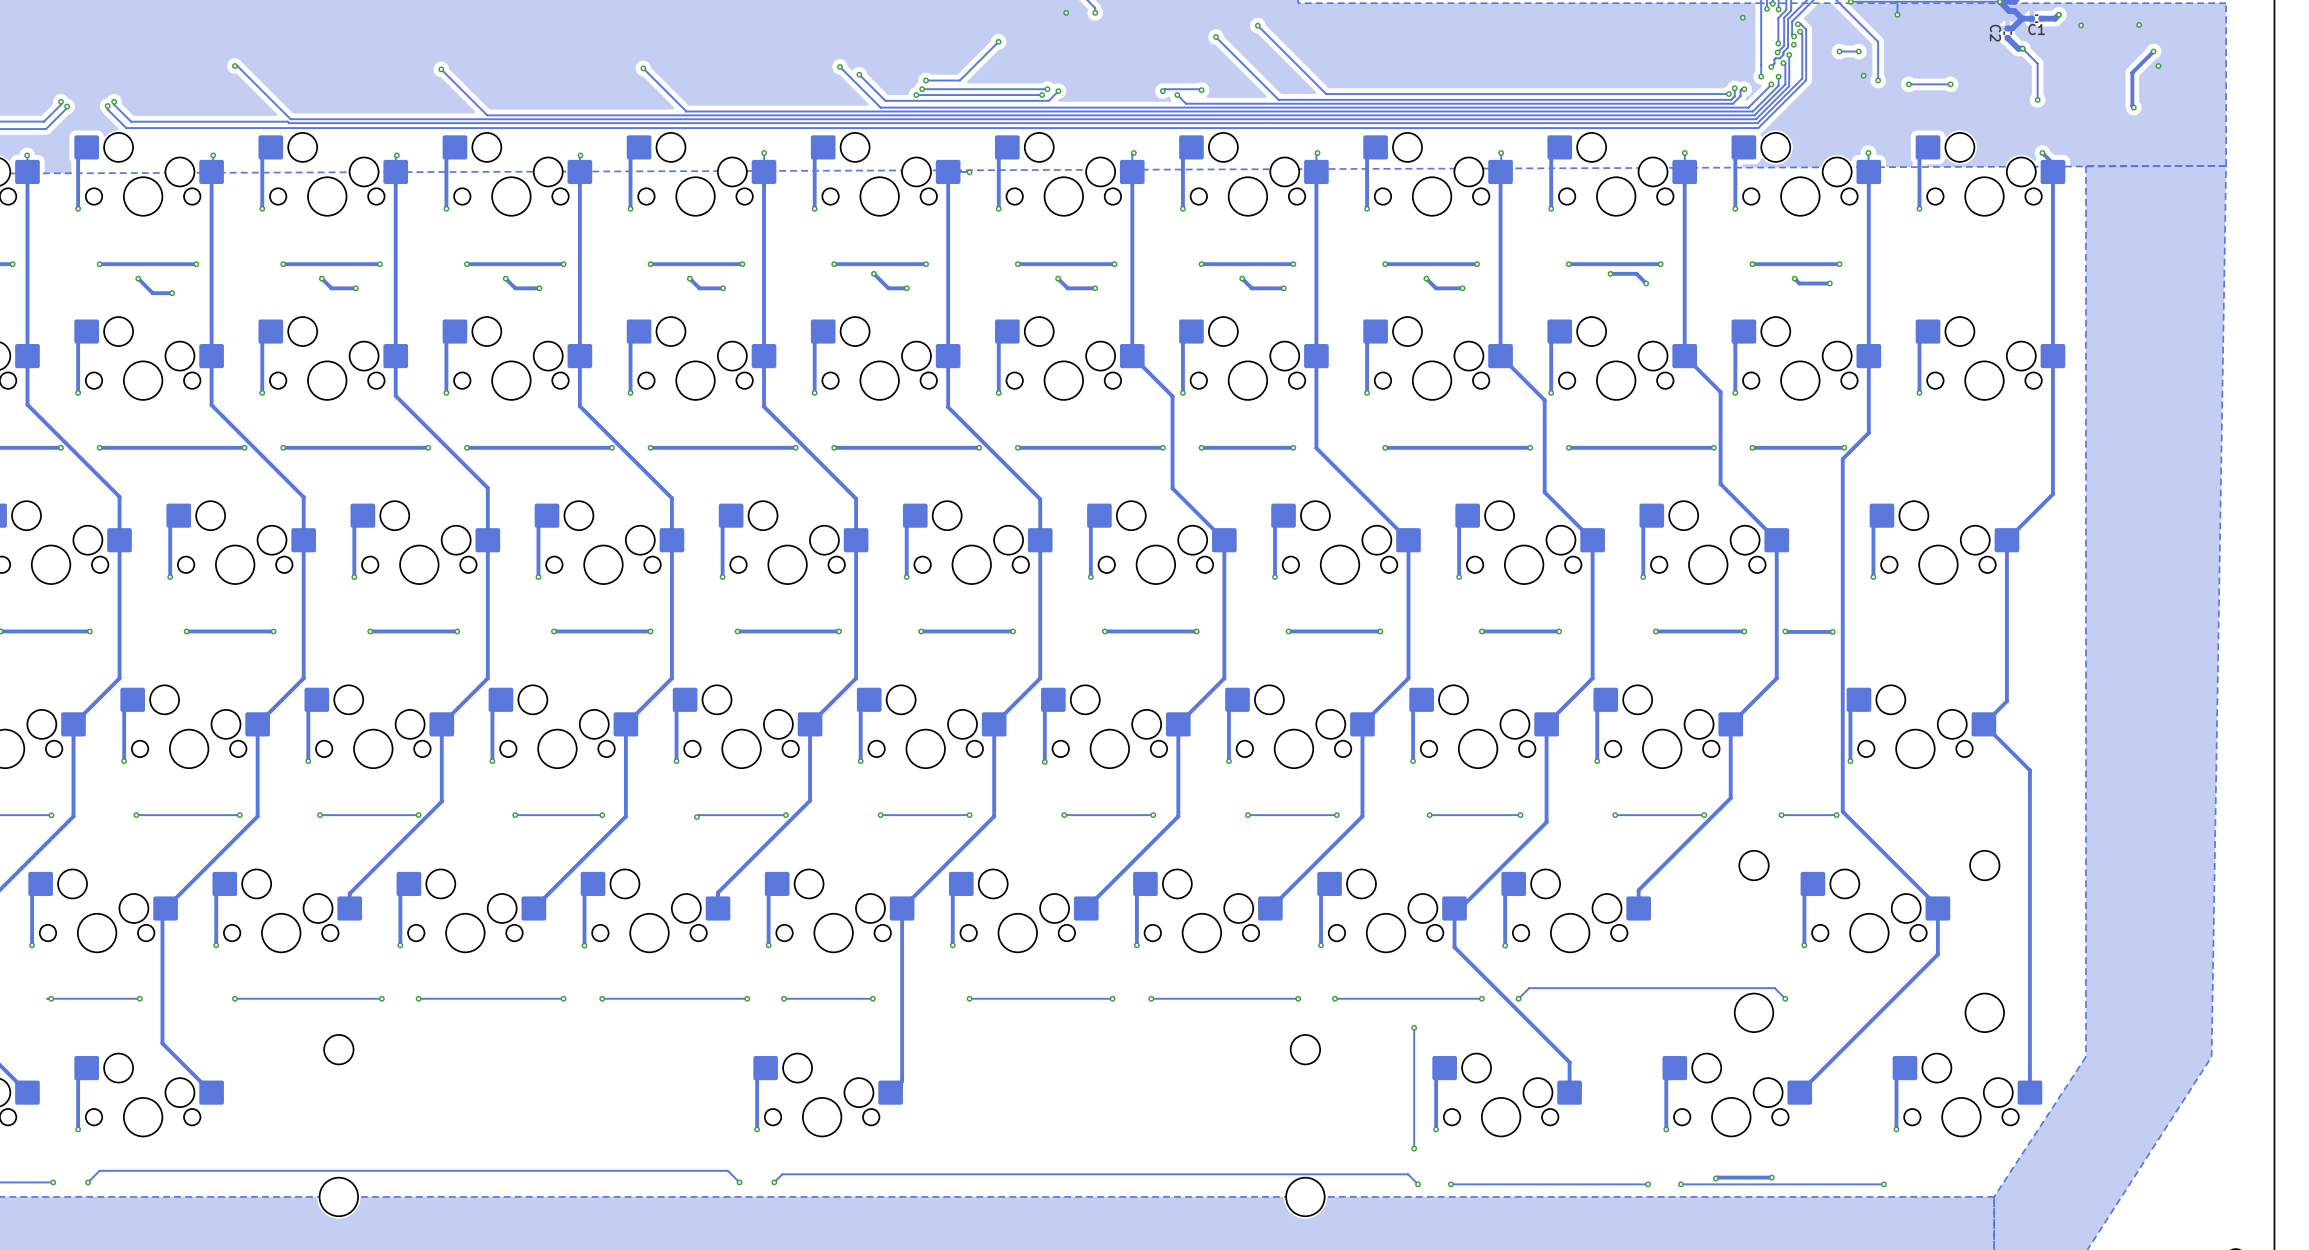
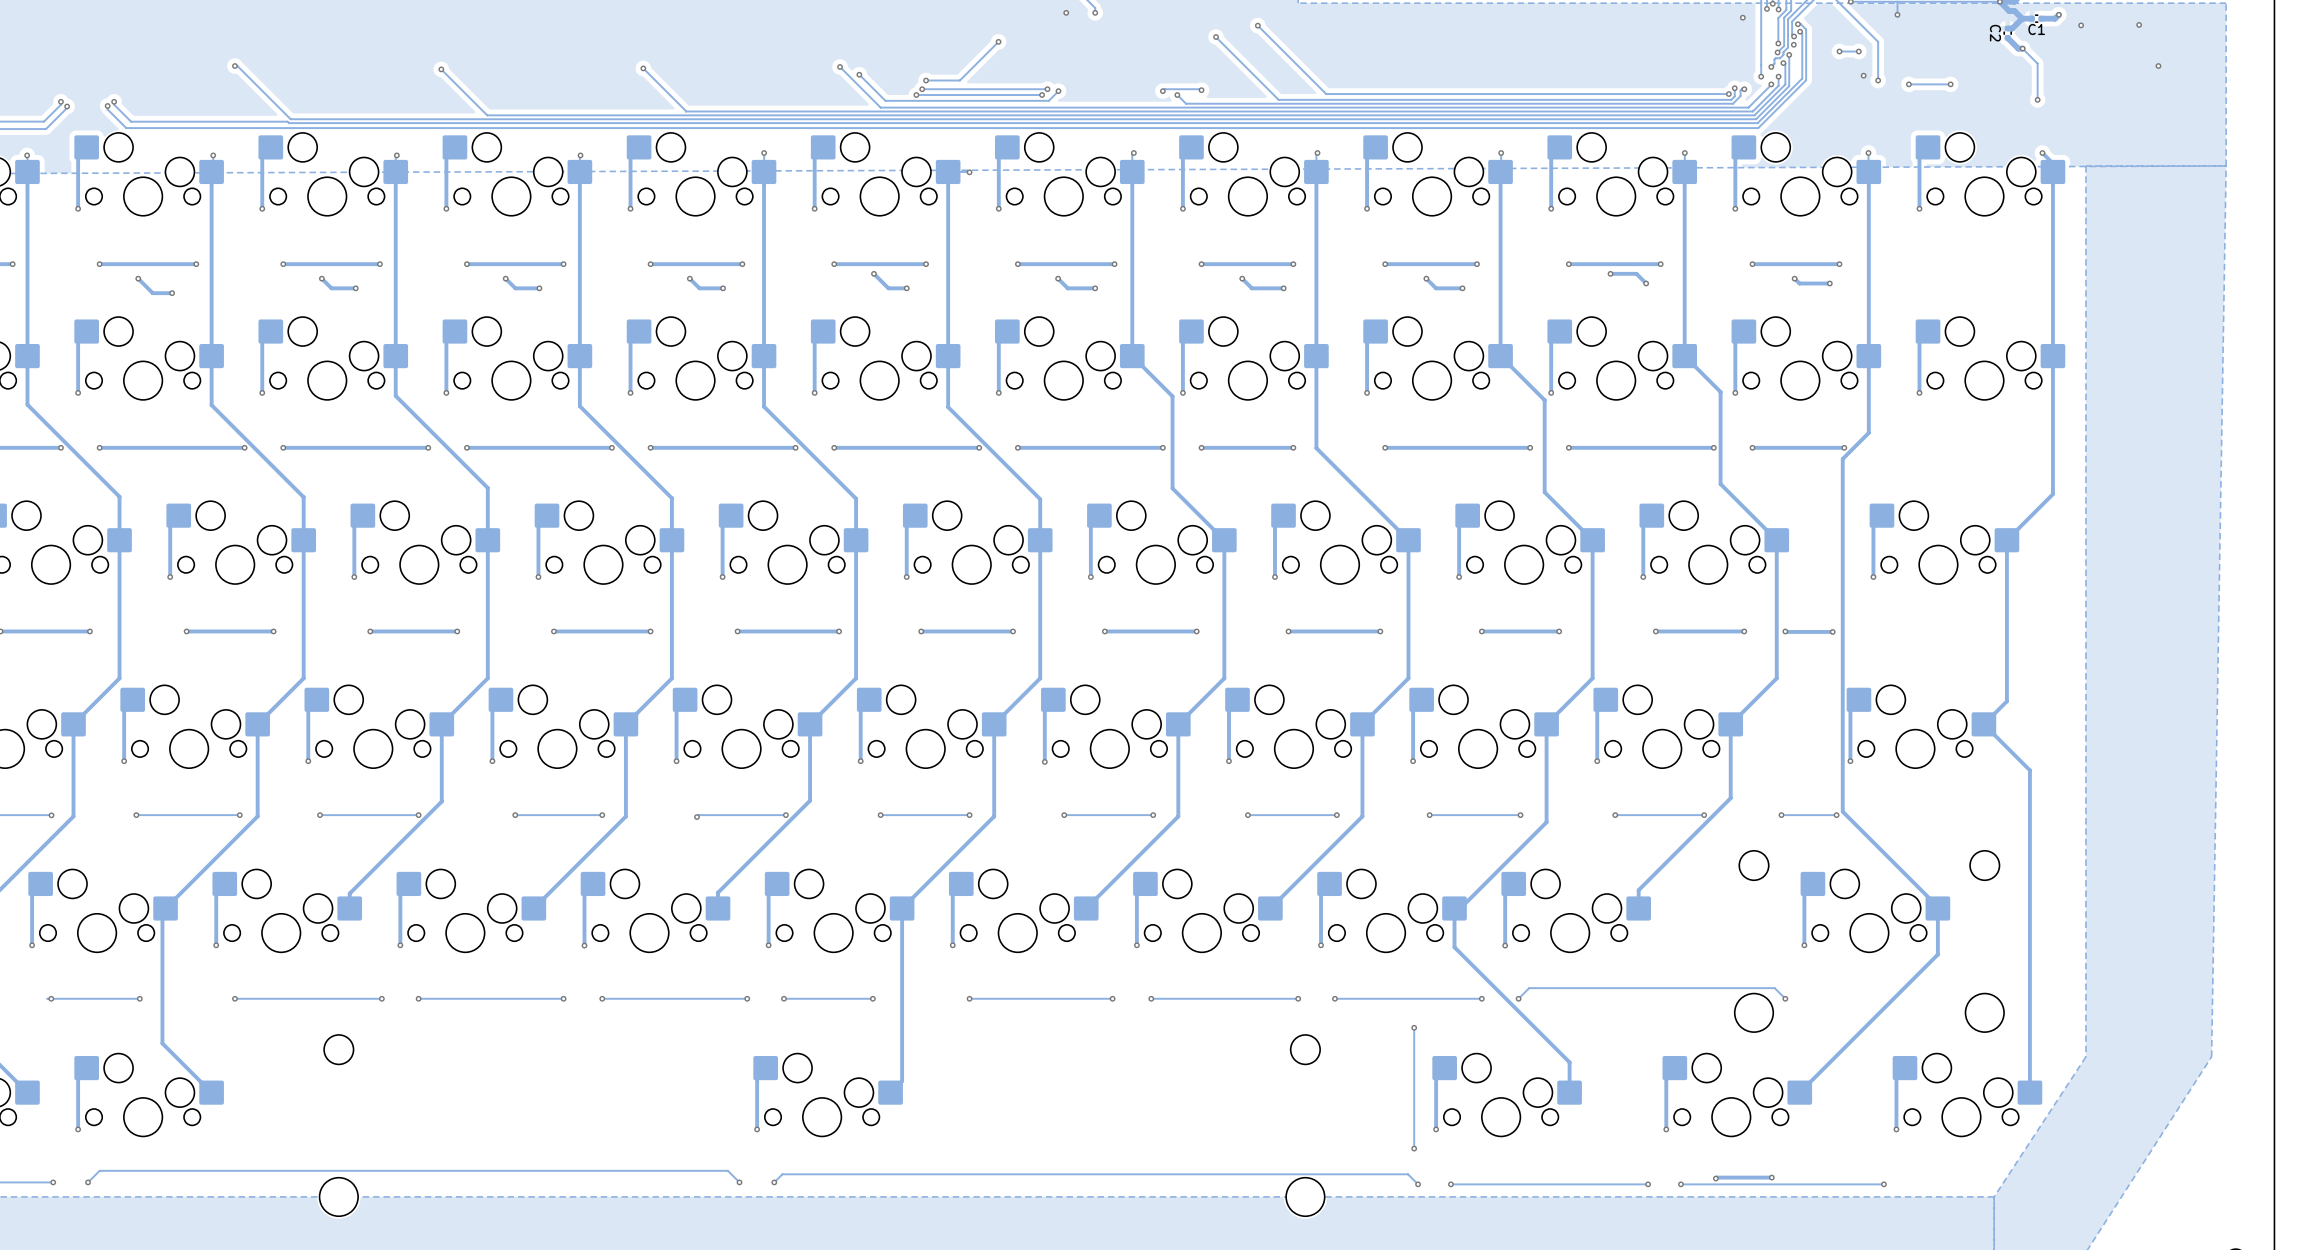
track: (2153, 51) (2132, 72) (2133, 107) -> none
via: (2153, 51) -> none
via: (2133, 107) -> none

